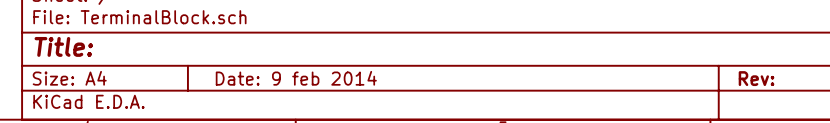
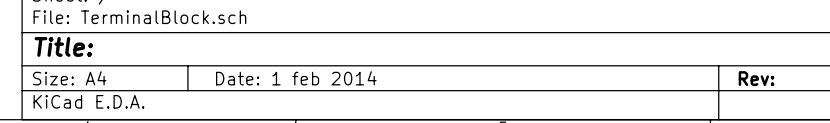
title block: Date: 9 feb 2014 (296, 78) -> Date: 1 feb 2014 (296, 78)

